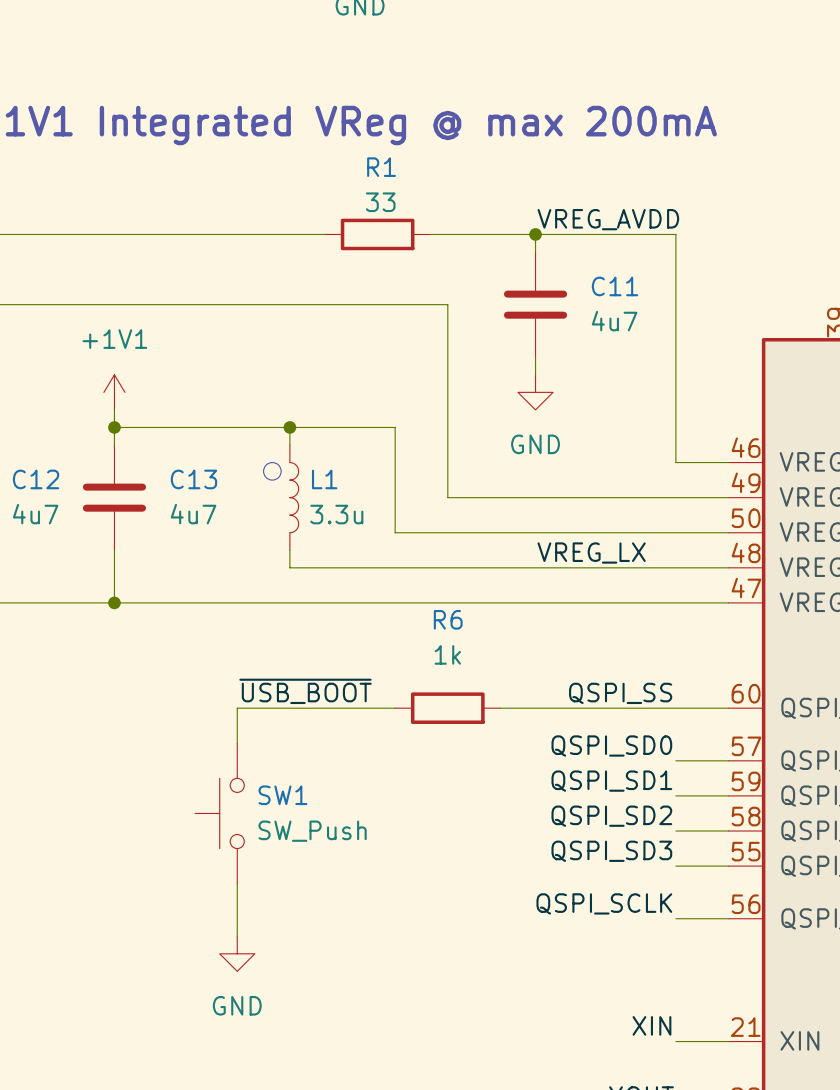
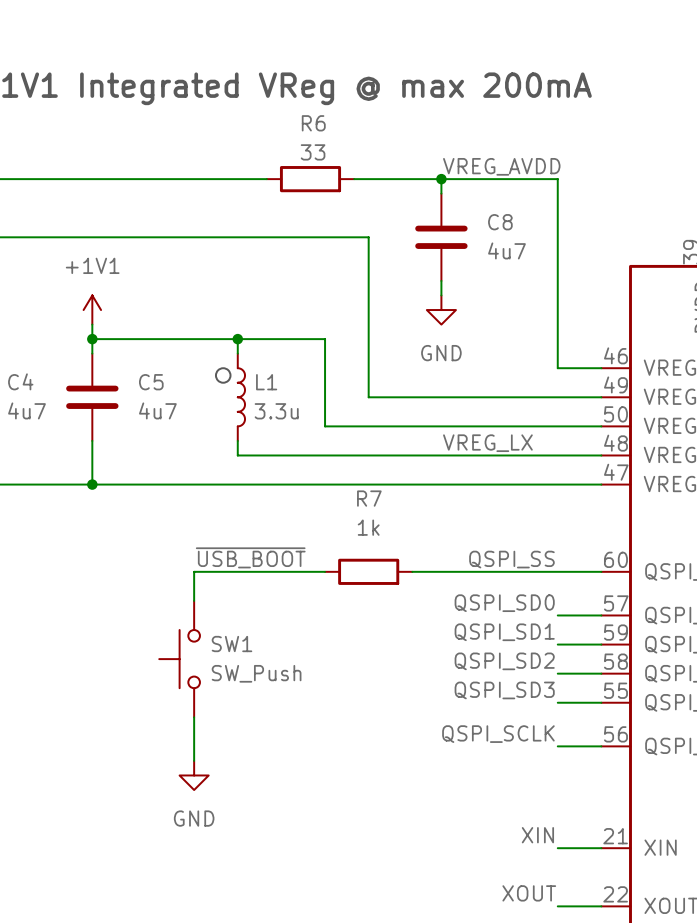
R1 name: R1 (381, 167) -> R6 (313, 123)
C11 name: C11 (615, 286) -> C8 (500, 222)
C12 name: C12 (36, 479) -> C4 (20, 381)
C13 name: C13 (193, 479) -> C5 (151, 382)
R6 name: R6 (448, 619) -> R7 (369, 498)

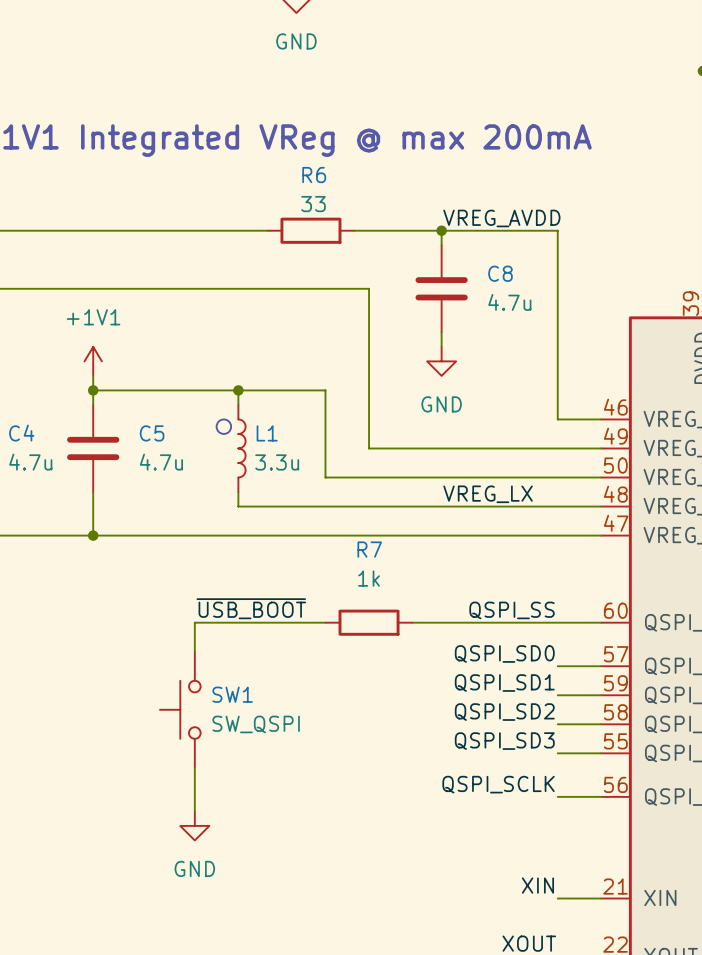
C8 value: 4u7 (506, 250) -> 4.7u (509, 302)
C4 value: 4u7 (26, 410) -> 4.7u (30, 462)
C5 value: 4u7 (157, 410) -> 4.7u (161, 462)
SW1 value: SW_Push (256, 673) -> SW_QSPI (256, 724)

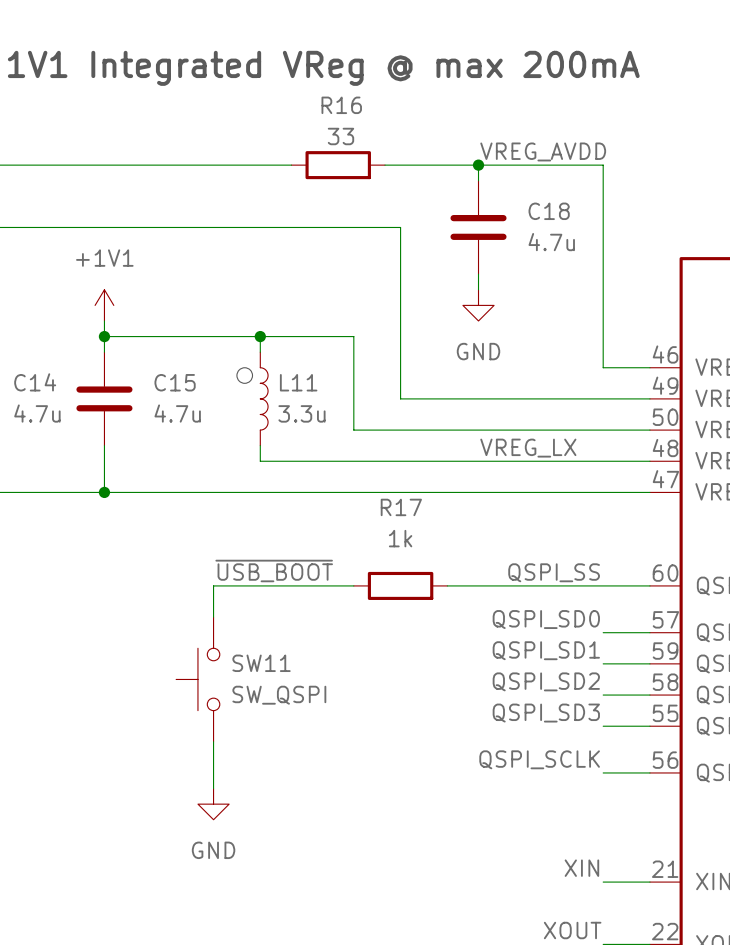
R6 name: R6 (314, 175) -> R16 (341, 105)
C8 name: C8 (500, 273) -> C18 (549, 211)
C4 name: C4 (21, 433) -> C14 (35, 382)
C5 name: C5 (152, 433) -> C15 (175, 382)
L1 name: L1 (267, 433) -> L11 (298, 382)
R7 name: R7 (369, 549) -> R17 (401, 507)
SW1 name: SW1 (232, 694) -> SW11 (261, 663)

